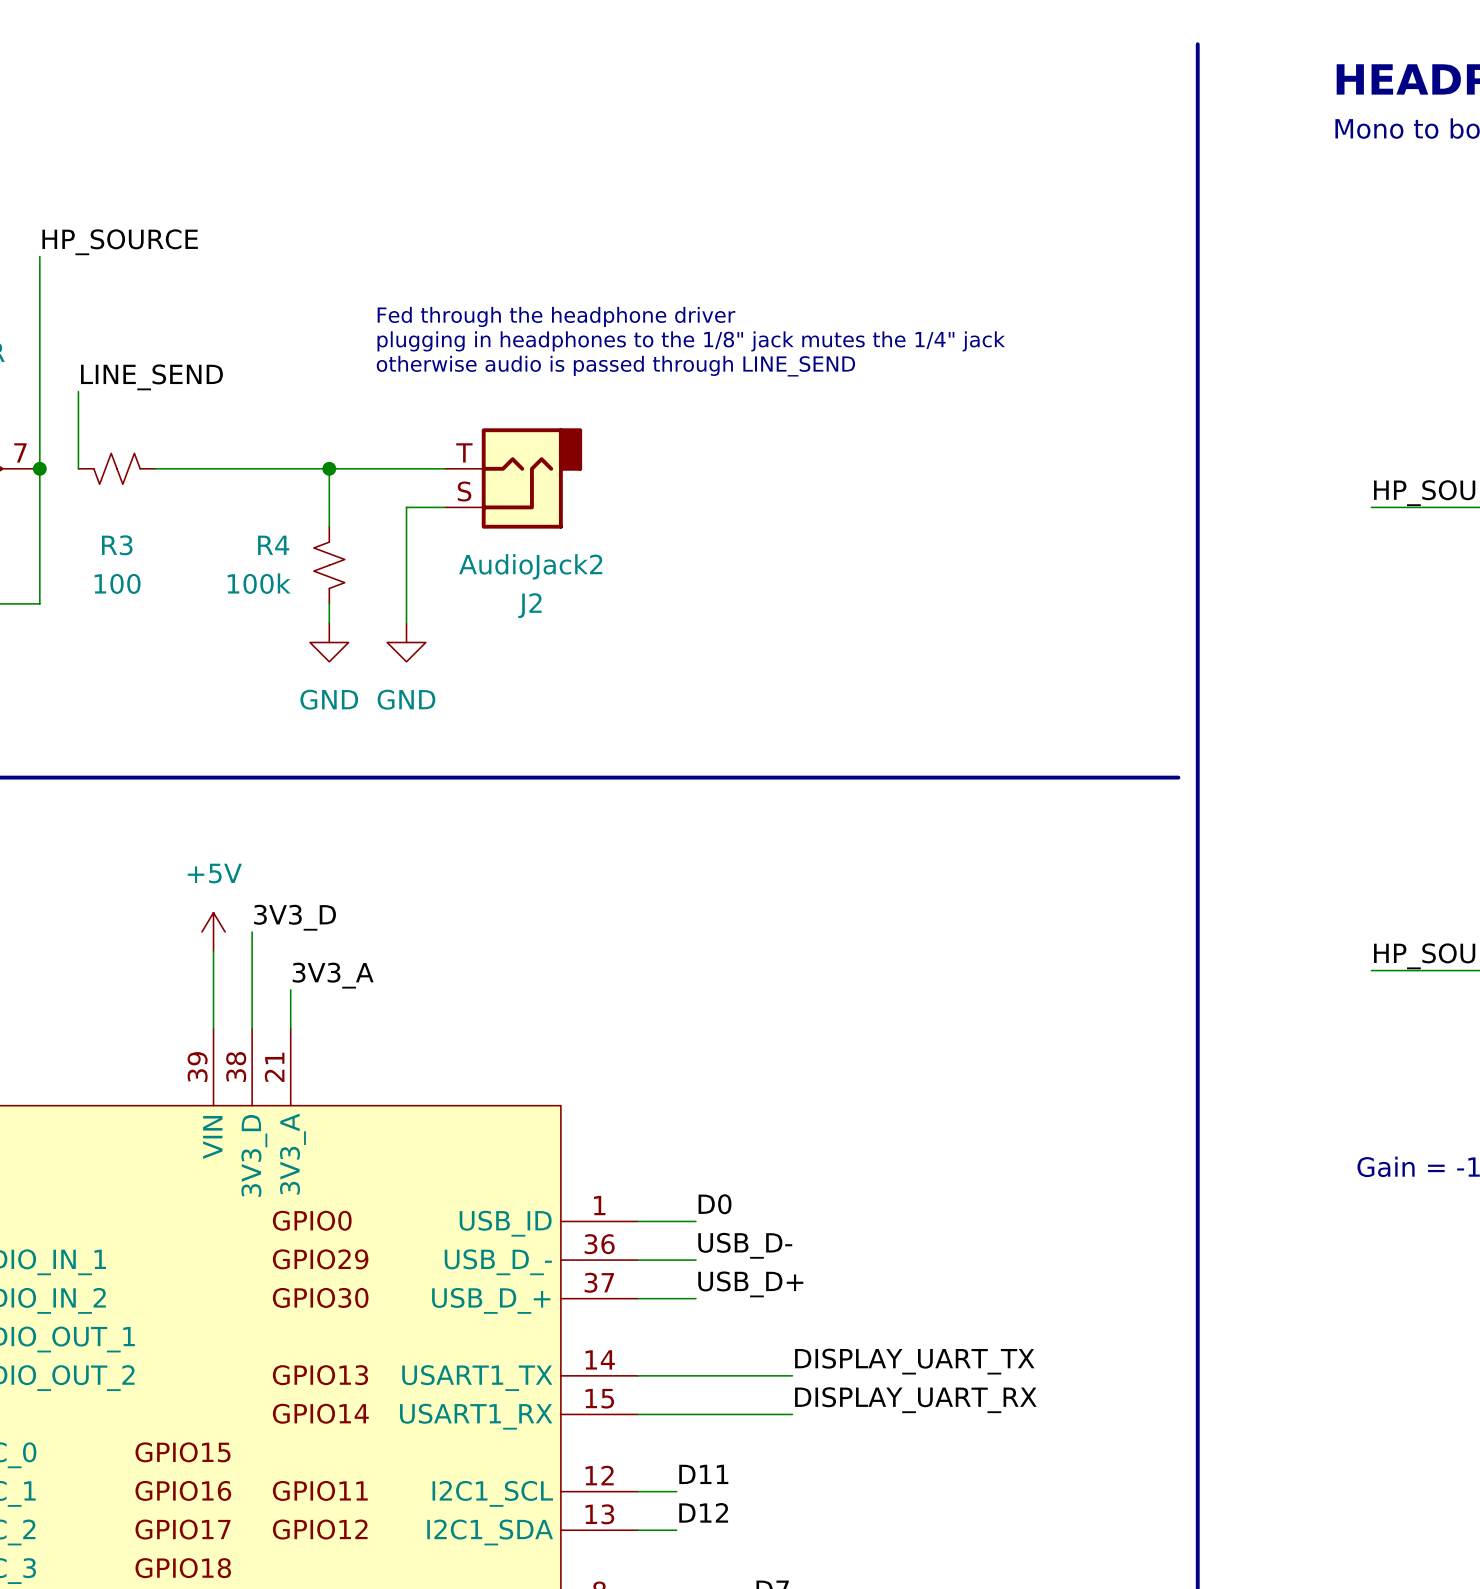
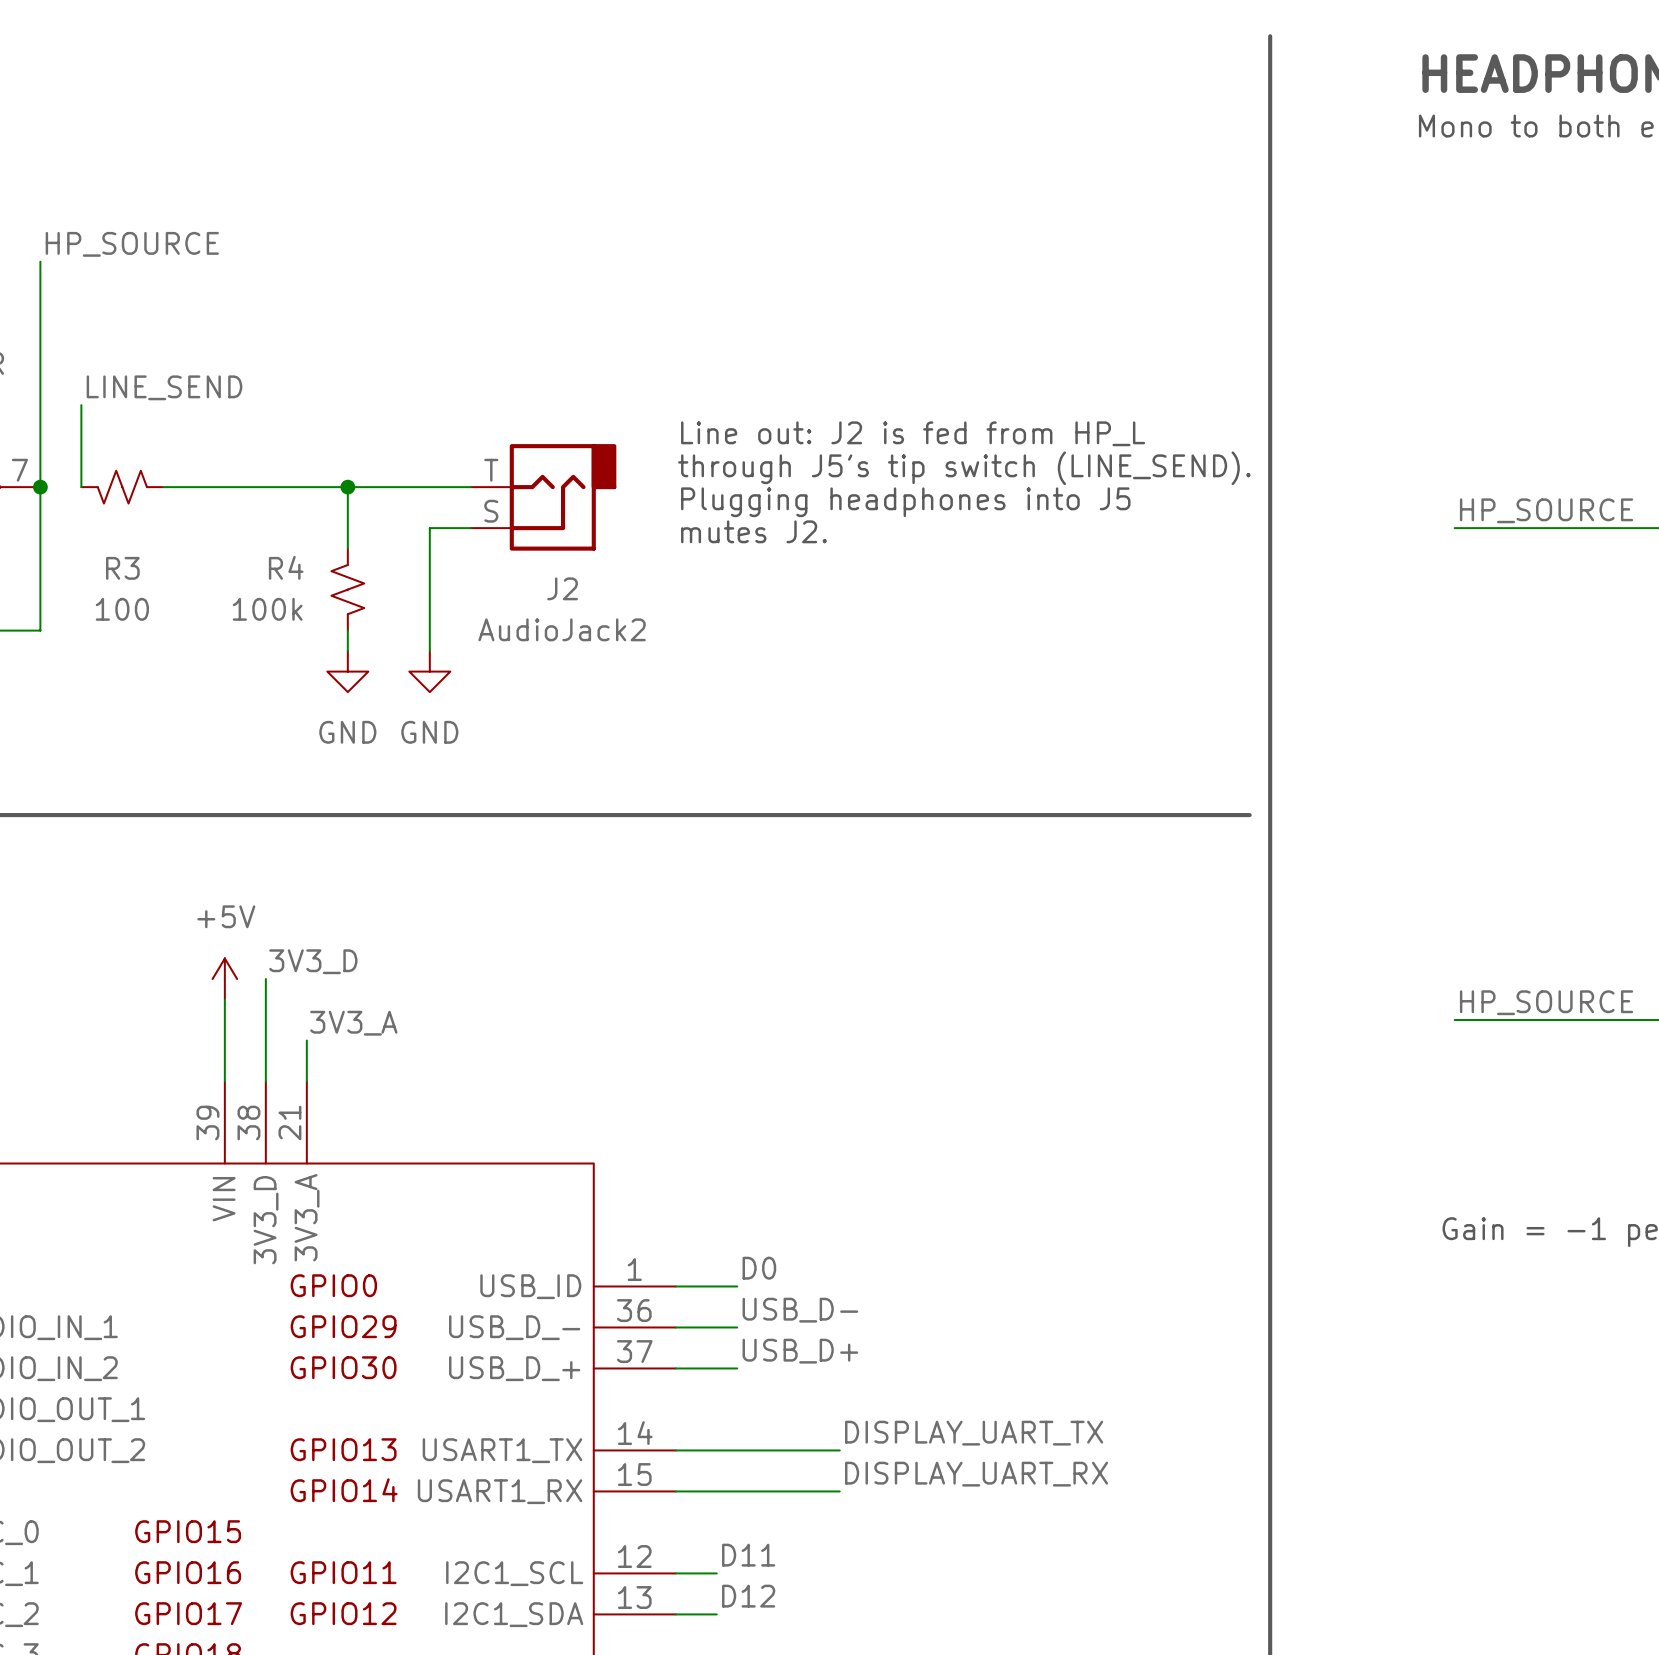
text: Fed through the headphone driver (556, 316) -> none
text: plugging in headphones to the 1/8" jack mutes the 1/4" jack (691, 341) -> none
text: otherwise audio is passed through LINE_SEND (615, 366) -> none
text: none -> Line out: J2 is fed from HP_L (913, 433)
text: none -> through J5's tip switch (LINE_SEND). (964, 468)
text: none -> Plugging headphones into J5 (905, 502)
text: none -> mutes J2. (754, 531)
J2 value position: AudioJack2 (530, 566) -> AudioJack2 (562, 629)
J2 name position: J2 (529, 605) -> J2 (562, 588)

